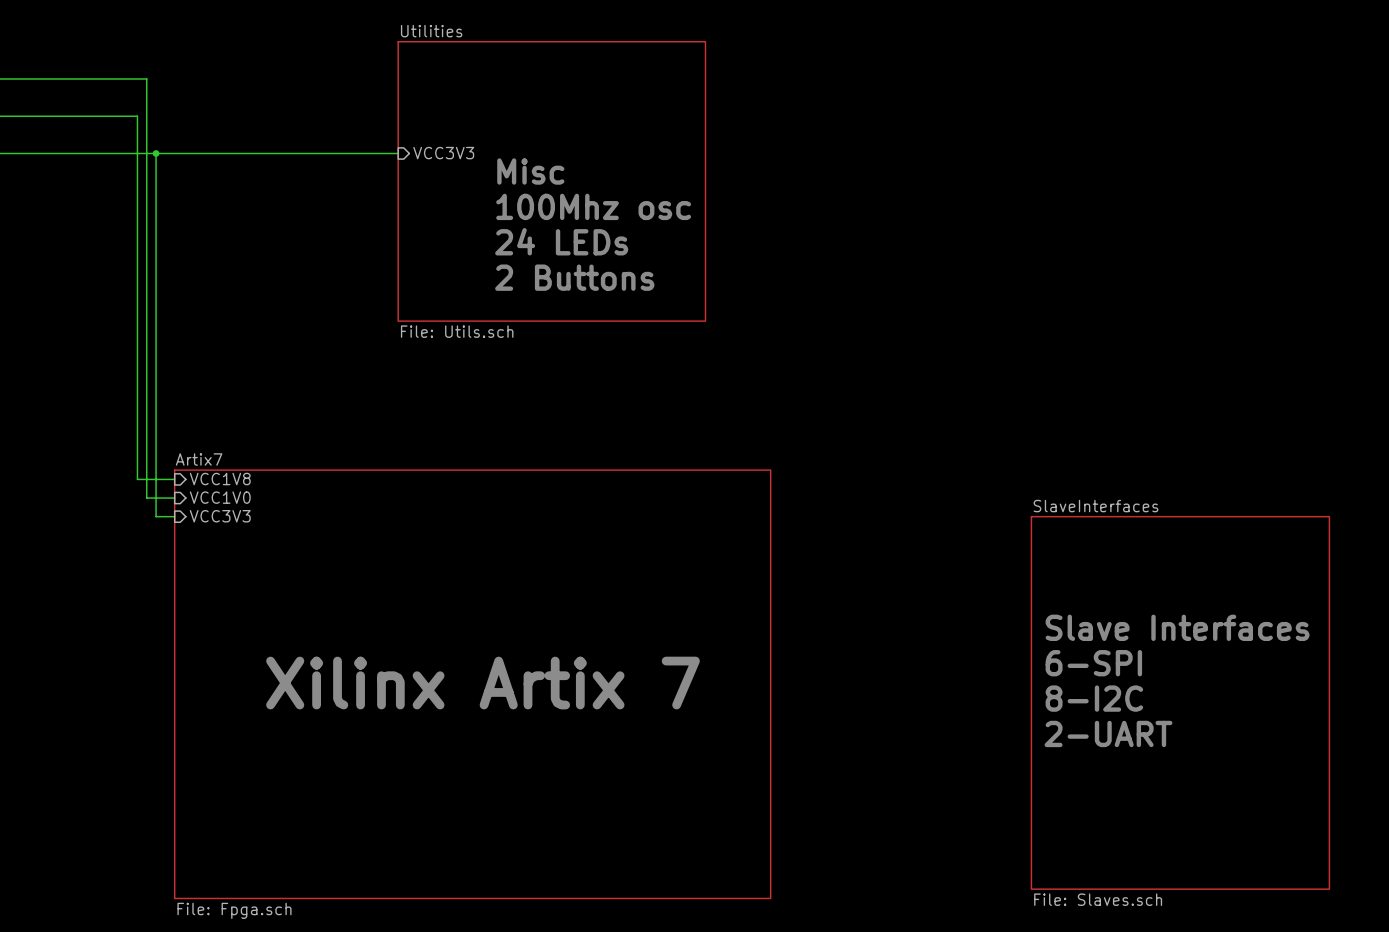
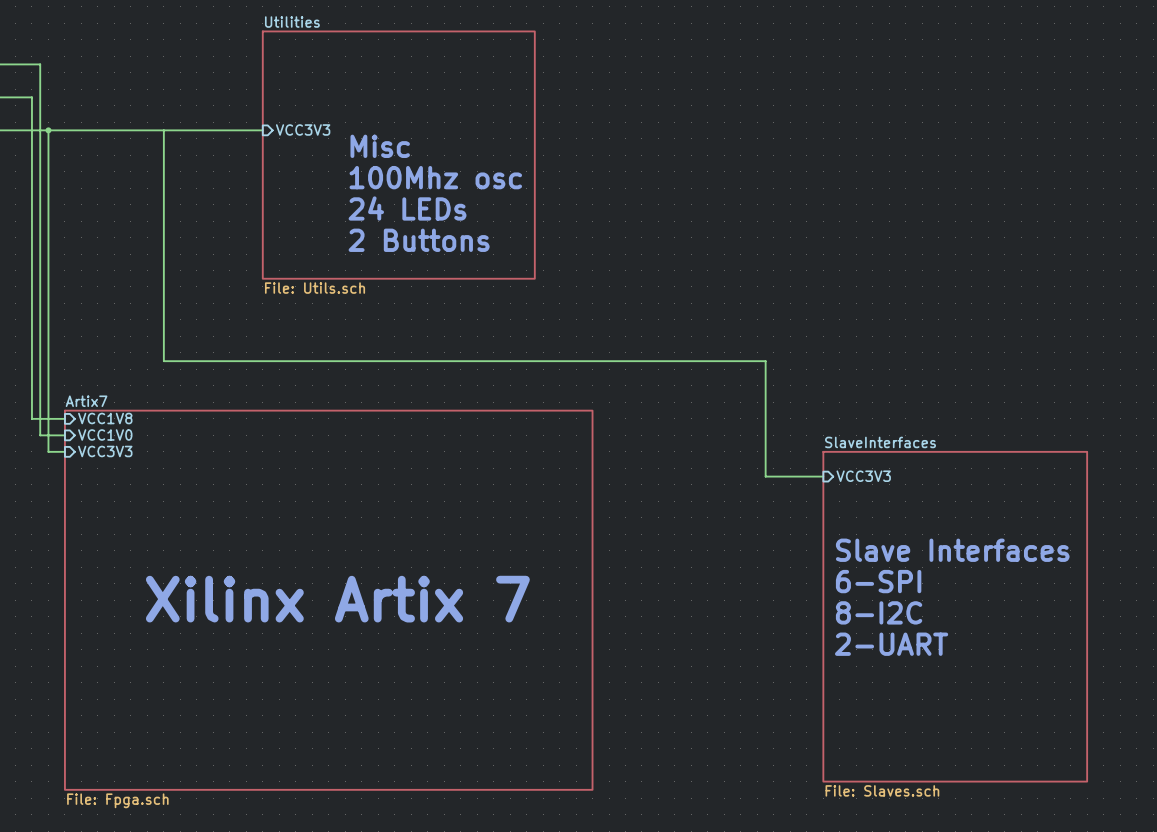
wire: none -> (163, 130) (163, 361) (765, 361) (765, 476) (823, 476)
sheet pin: none -> VCC3V3 (863, 476)

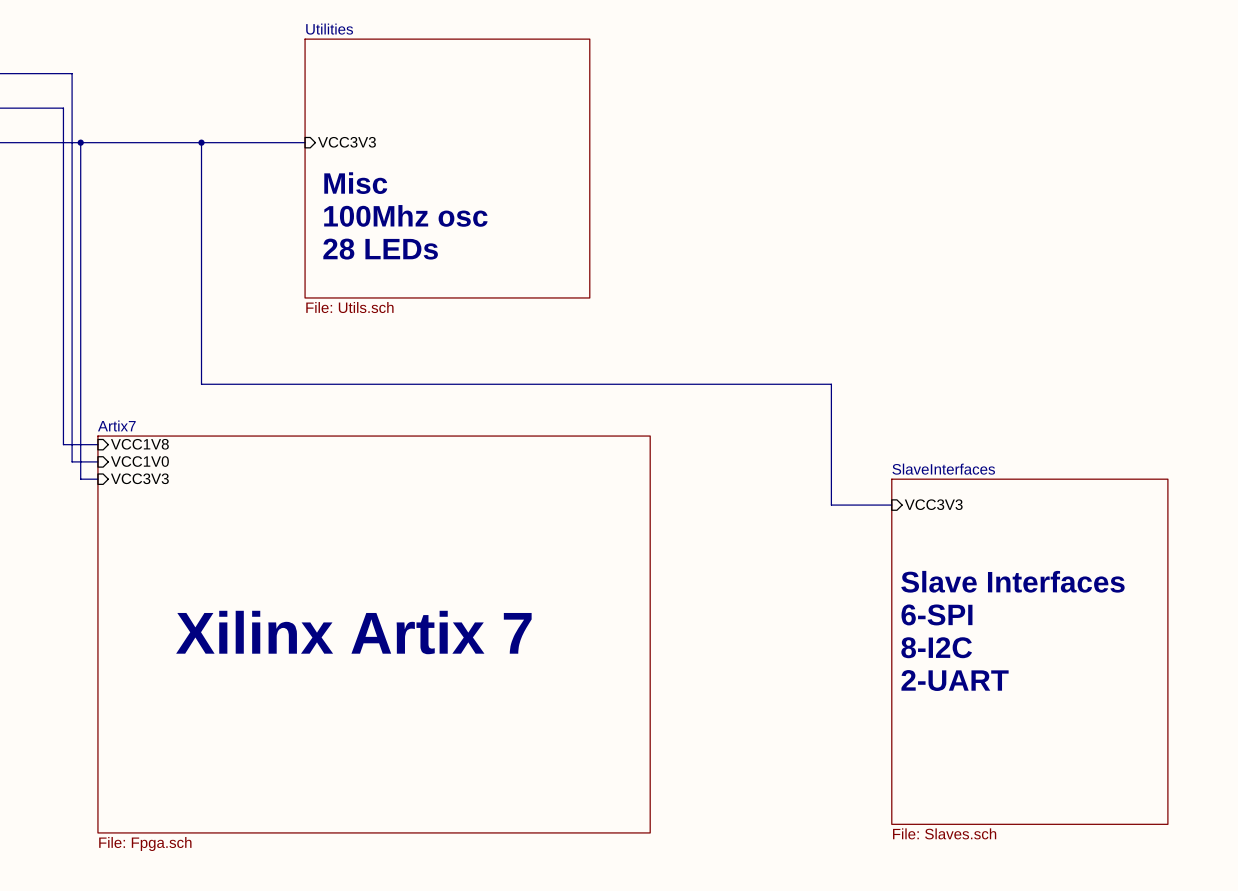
junction: none -> (201, 142)
text position: Misc (380, 146) -> Misc (355, 183)
text position: 100Mhz osc (435, 177) -> 100Mhz osc (405, 215)
text: 24 LEDs (407, 208) -> 28 LEDs (380, 249)
text: 2 Buttons (419, 240) -> none

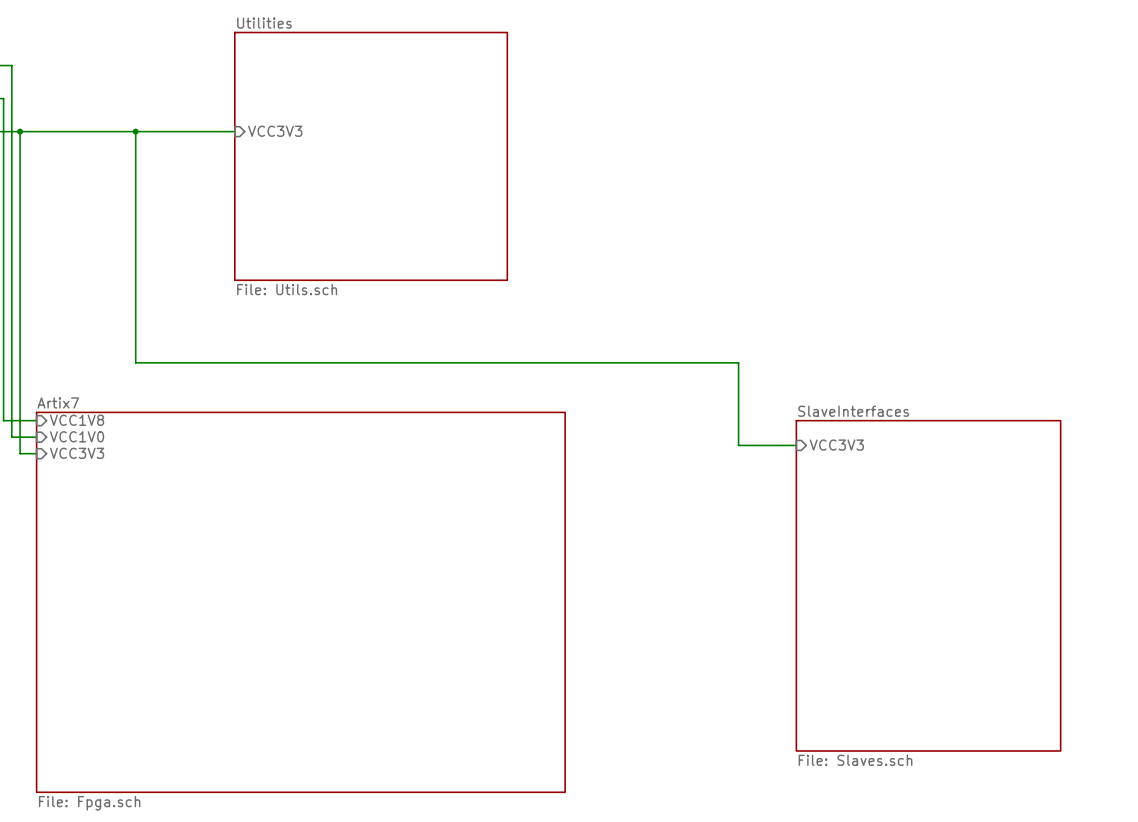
text: Misc (355, 183) -> none
text: 100Mhz osc (405, 215) -> none
text: 28 LEDs (380, 249) -> none
wire: (831, 470) (831, 505) (891, 505) -> (738, 445) (796, 445)
sheet pin position: VCC3V3 (933, 504) -> VCC3V3 (836, 445)
text: Slave Interfaces (1012, 581) -> none
text: 6-SPI (936, 614) -> none
text: Xilinx Artix 7 (353, 632) -> none
text: 8-I2C (936, 647) -> none
sheet SlaveInterfaces position: (1029, 651) -> (928, 585)
text: 2-UART (955, 680) -> none

